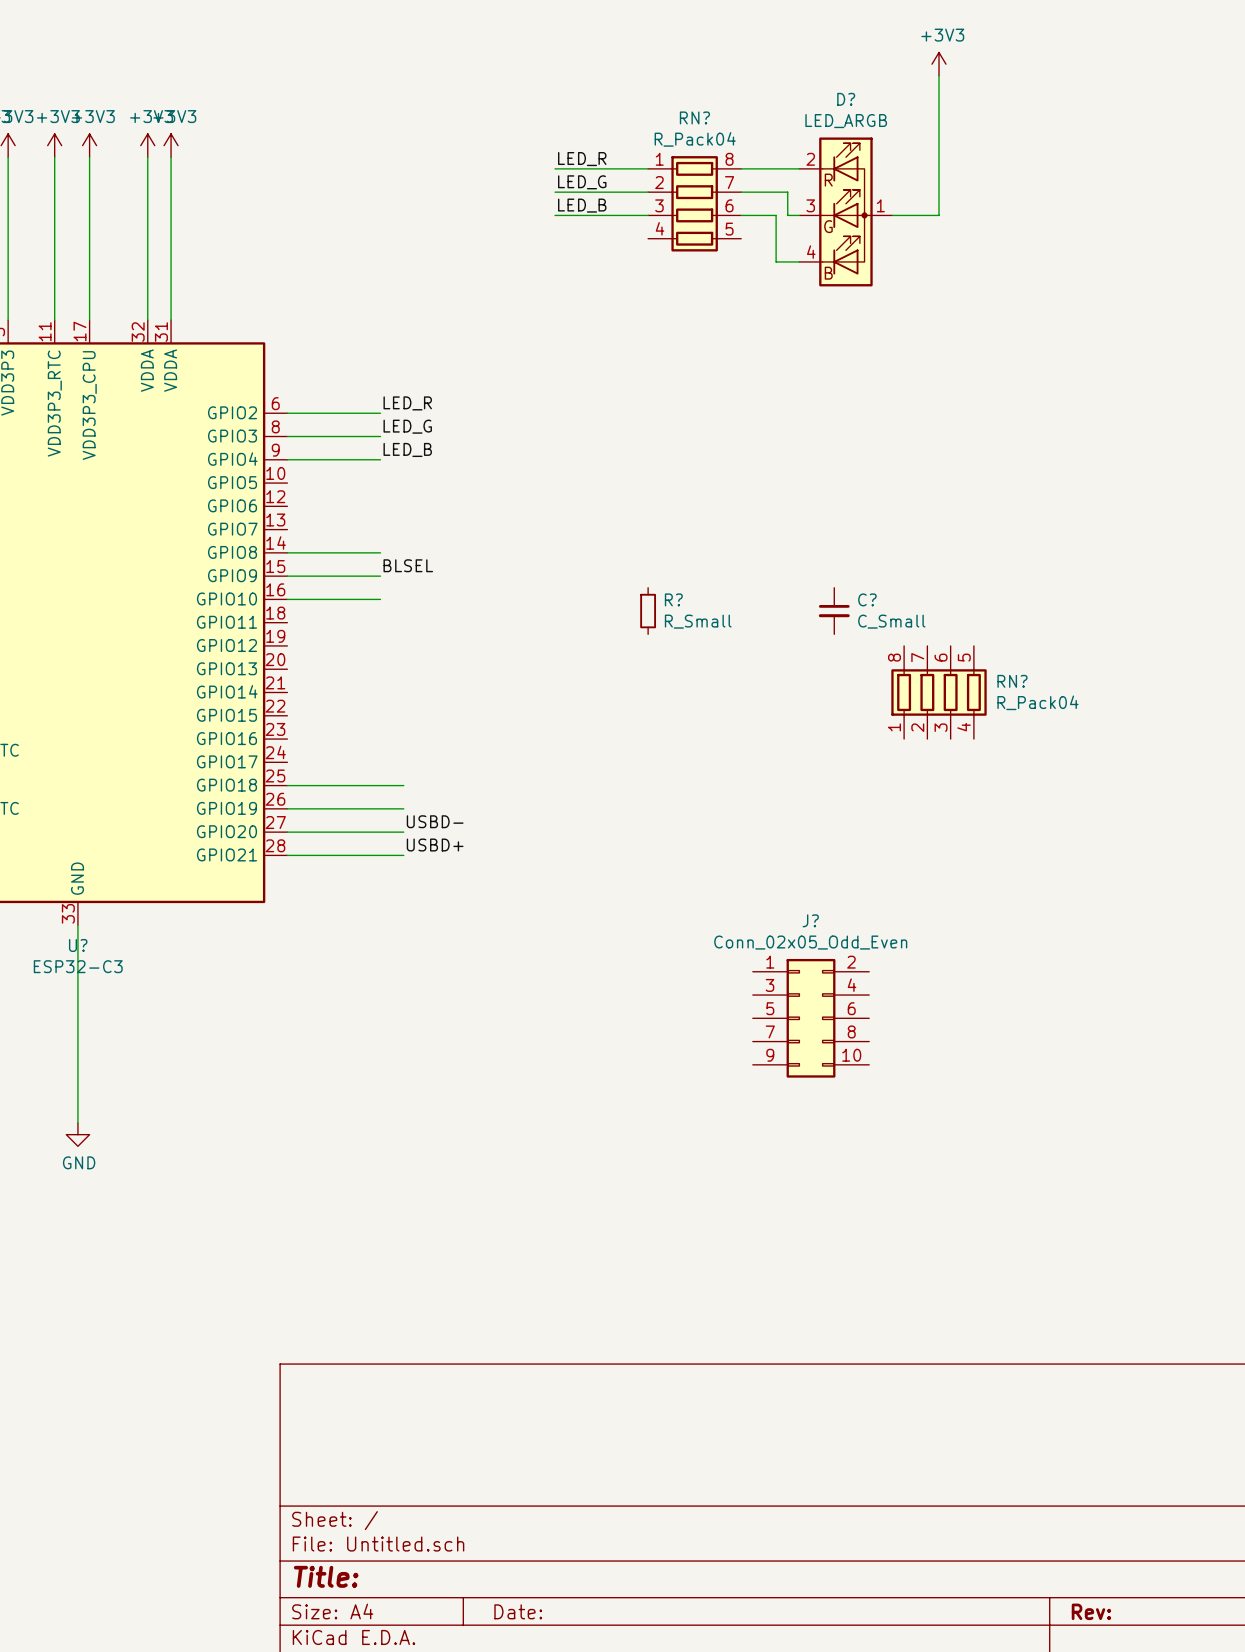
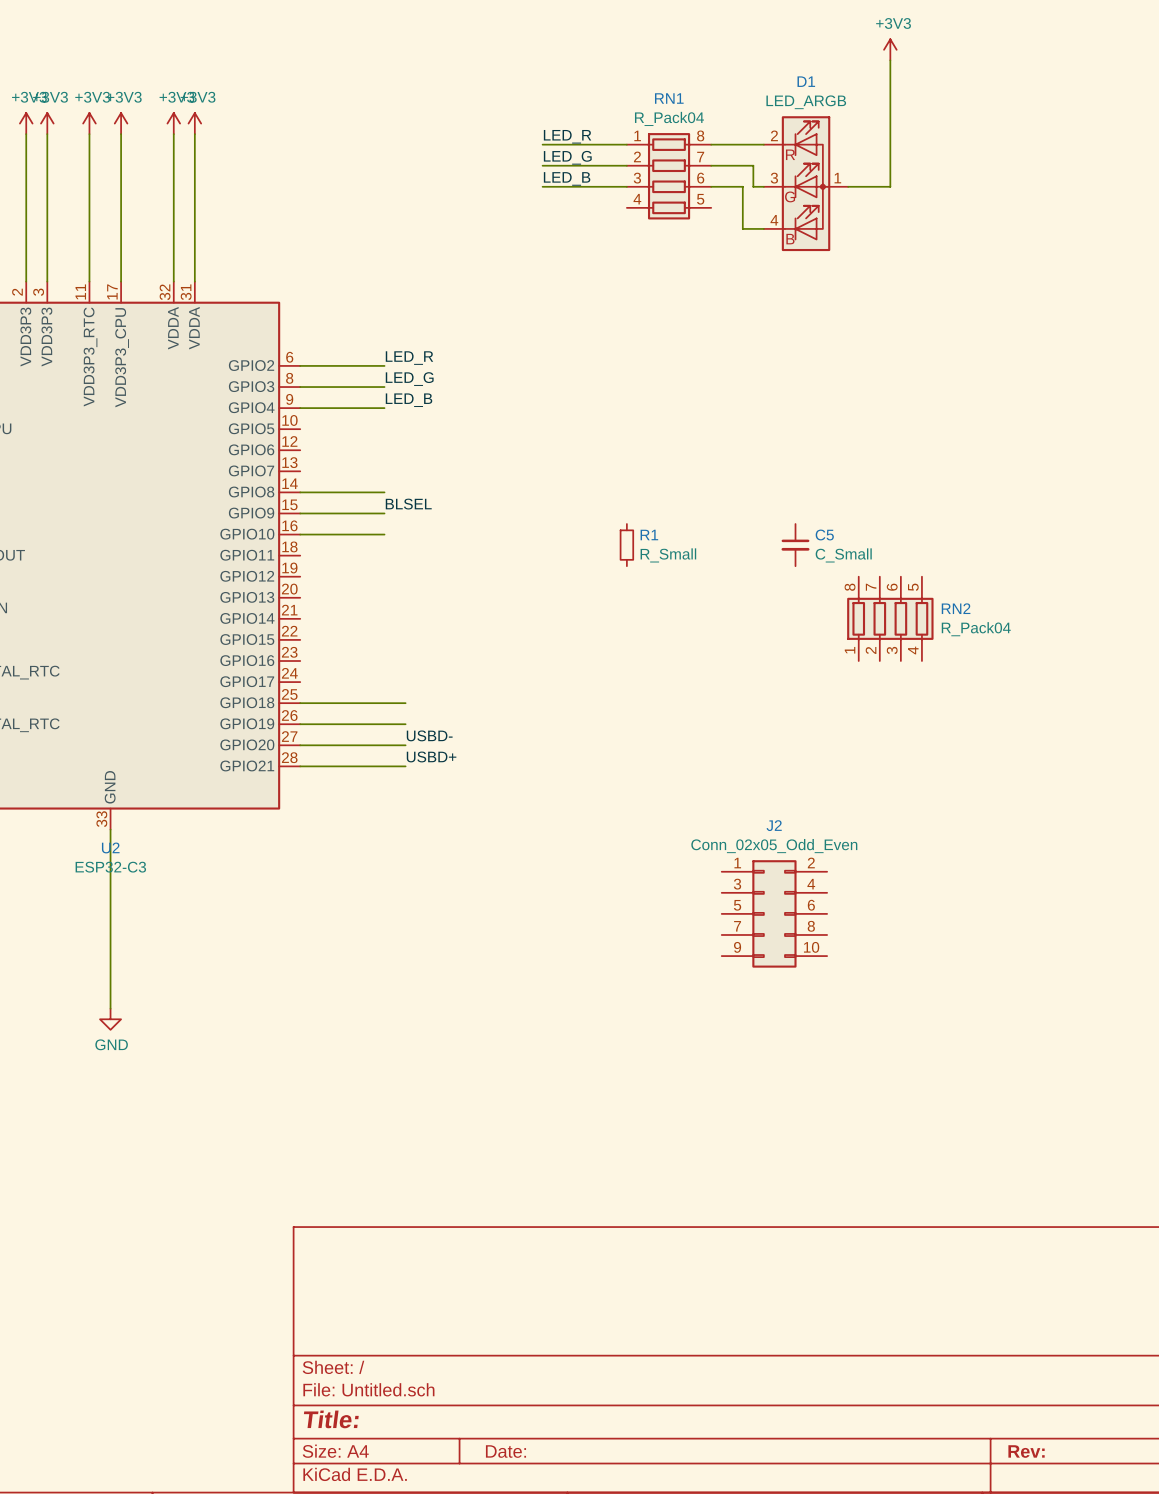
D? name: D? (846, 99) -> D1 (806, 81)
RN? name: RN? (694, 117) -> RN1 (669, 98)
R? name: R? (673, 599) -> R1 (649, 535)
C? name: C? (867, 599) -> C5 (824, 534)
RN? name: RN? (1012, 681) -> RN2 (956, 608)
J? name: J? (810, 920) -> J2 (774, 825)
U? name: U? (78, 945) -> U2 (110, 847)

